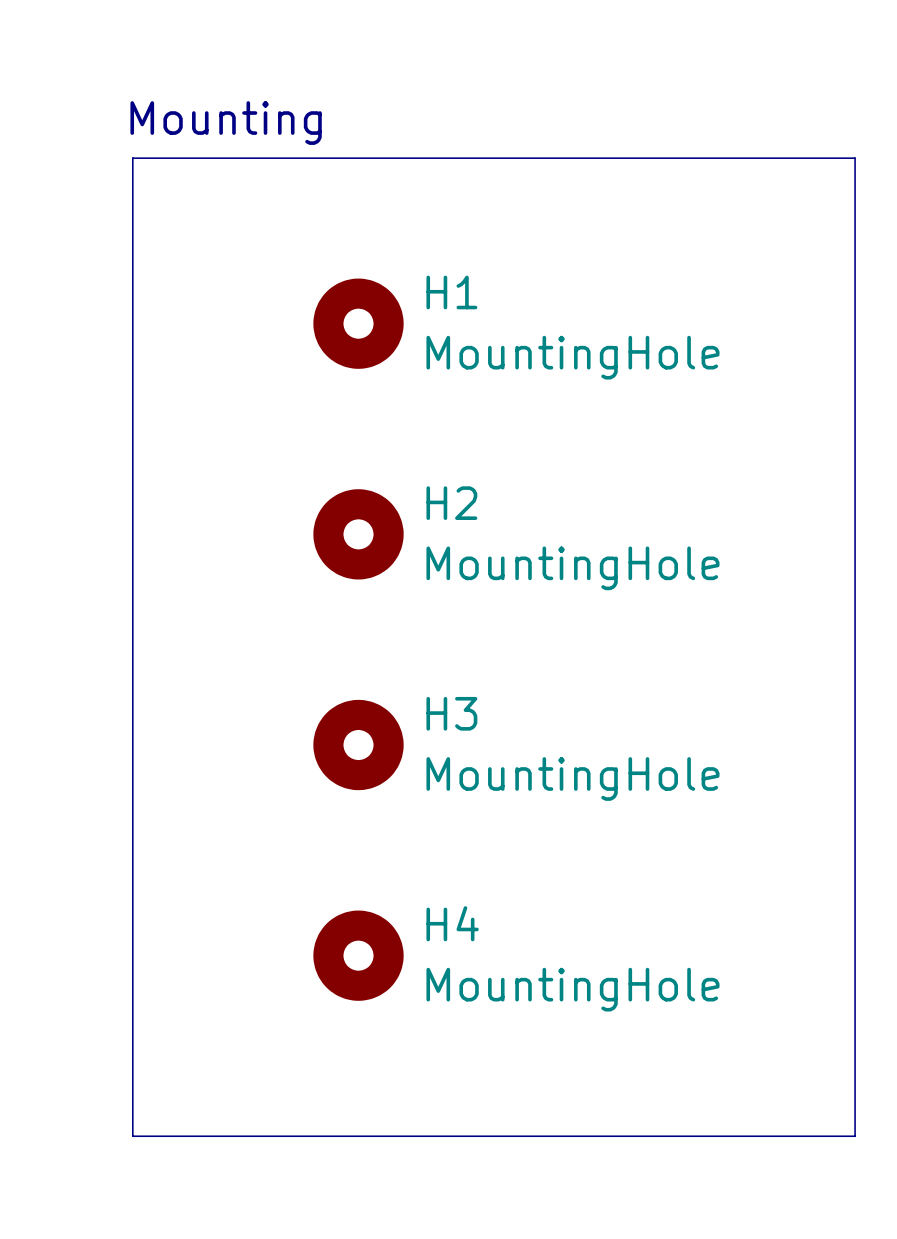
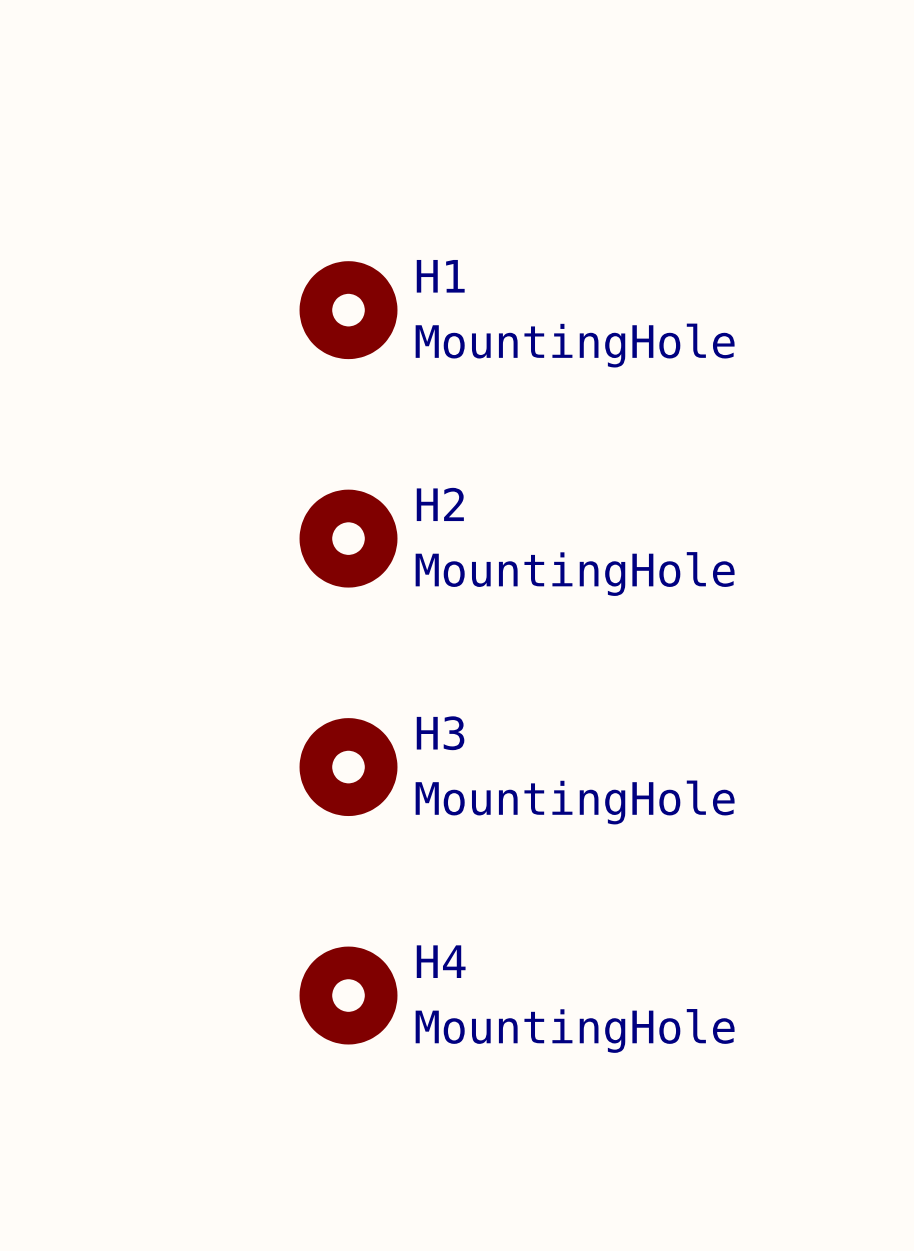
text: Mounting (226, 123) -> none
line: (132, 158) (855, 158) (855, 1136) (132, 1136) (132, 158) -> none

